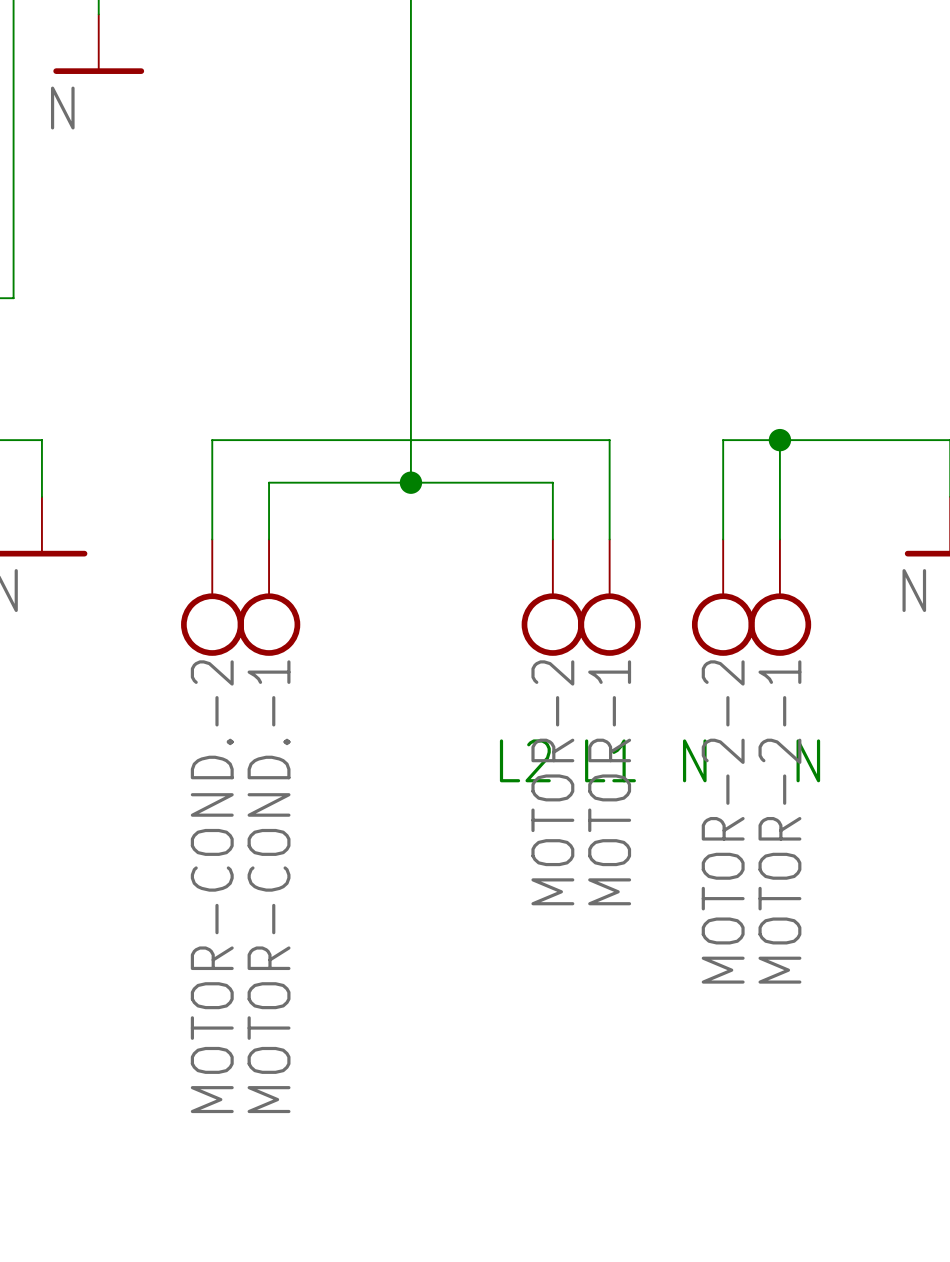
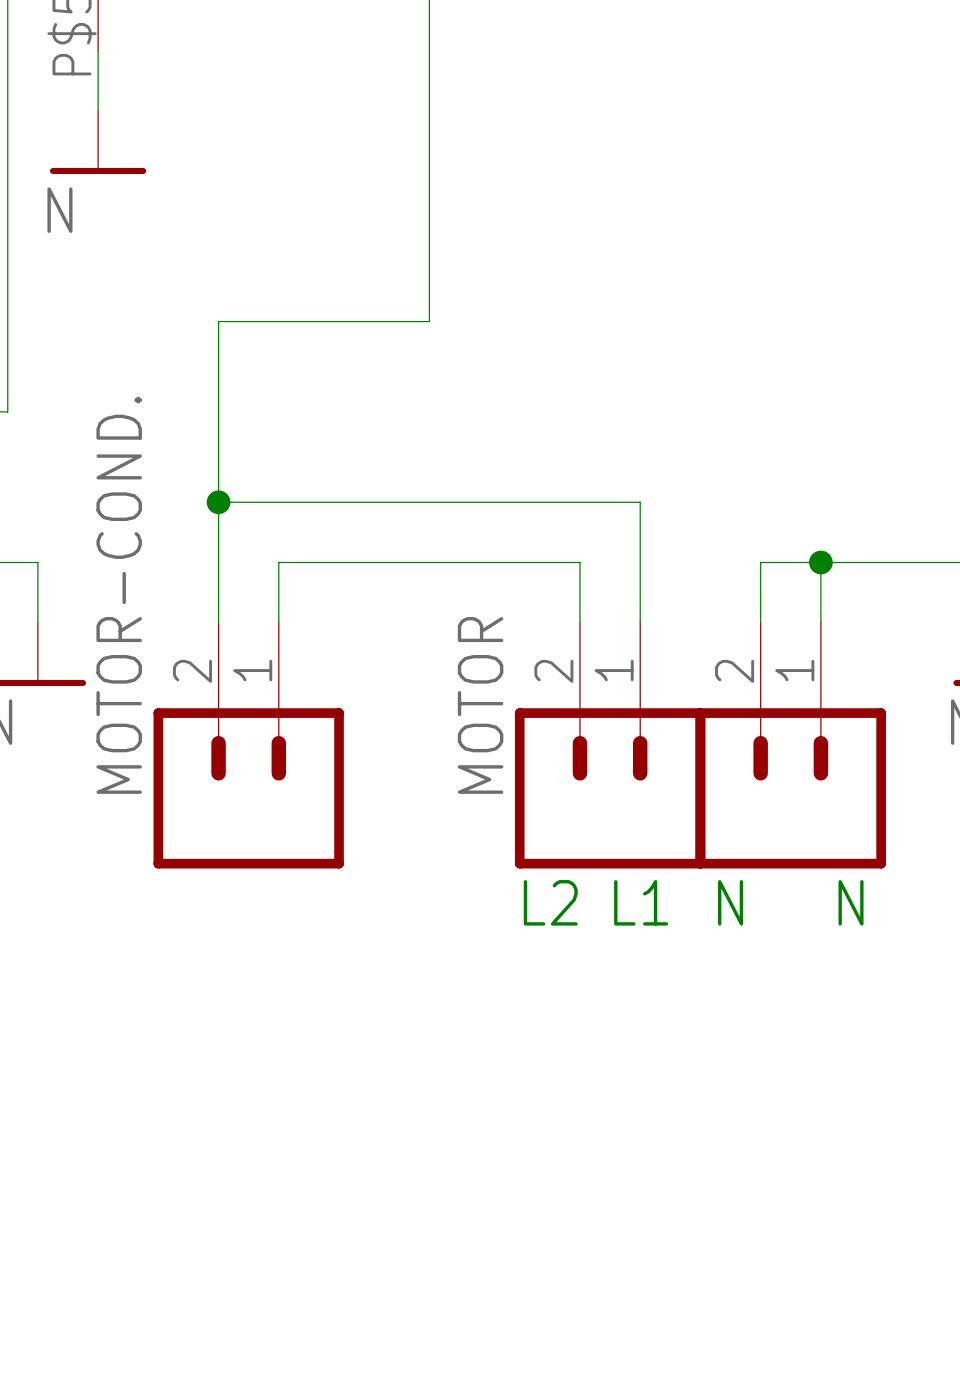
wire: (410, 213) (410, 482) -> (429, 321) (218, 321) (218, 562)
wire: none -> (218, 502) (640, 502) (640, 562)
junction: none -> (218, 502)
wire: (212, 440) (269, 440) -> (278, 607) (278, 562)
wire: (552, 440) (609, 440) -> (579, 562) (579, 607)
wire: (269, 482) (552, 482) -> none
junction: (410, 482) -> none
MOTOR-COND.-2: (212, 597) -> none
MOTOR-COND.-1: (269, 597) -> none
MOTOR-2: (552, 597) -> none
MOTOR-1: (609, 597) -> none
MOTOR-2-2: (723, 597) -> none
MOTOR-2-1: (779, 597) -> none
MOTOR-COND.: none -> (248, 745)
MOTOR: none -> (610, 745)
part: none -> (790, 745)

